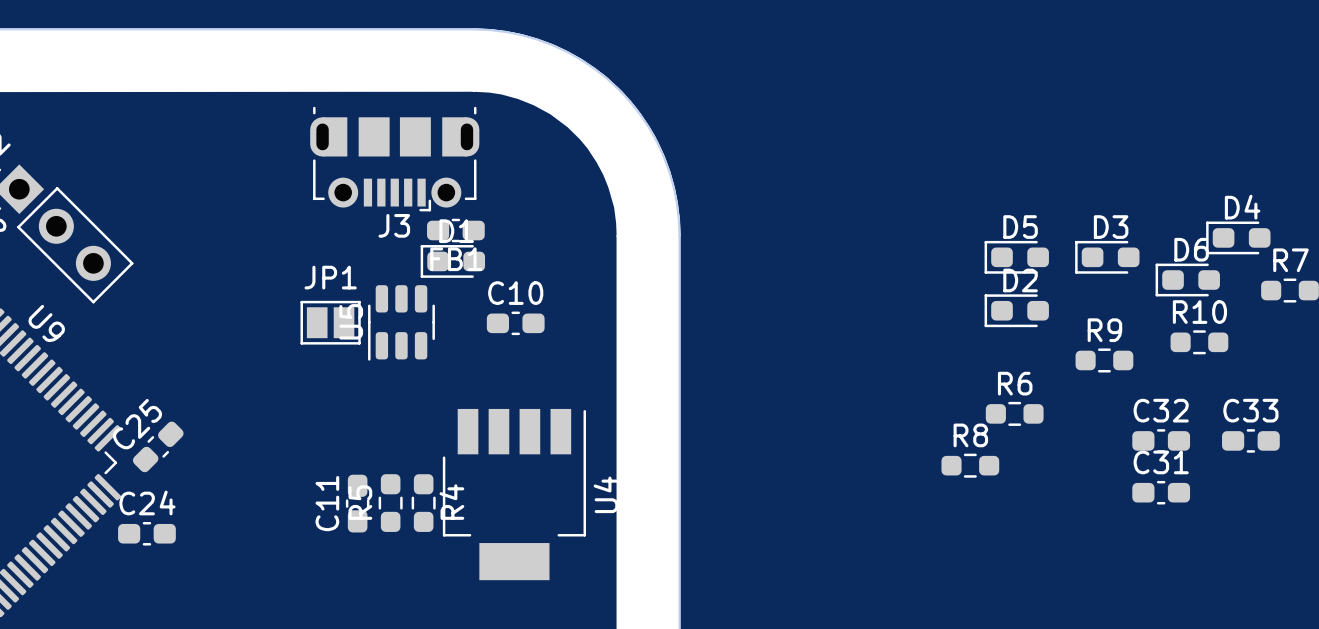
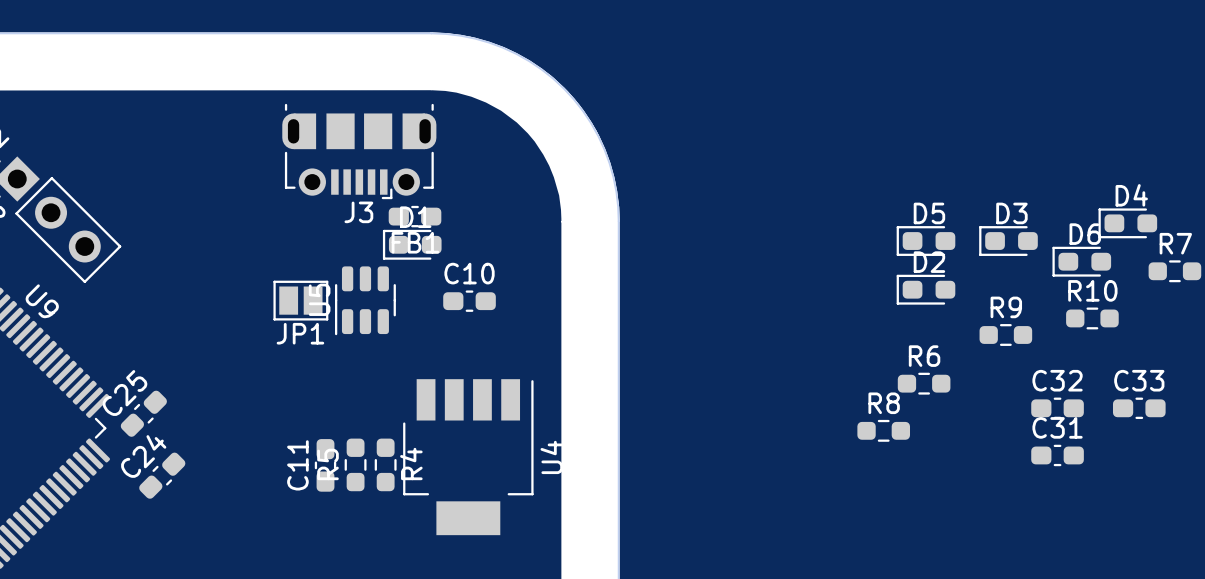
JP1 name position: JP1 (330, 277) -> JP1 (300, 333)
C24 rotation: 0° (146, 533) -> 45° counterclockwise (162, 475)
C24 position: (146, 533) -> (162, 475)

